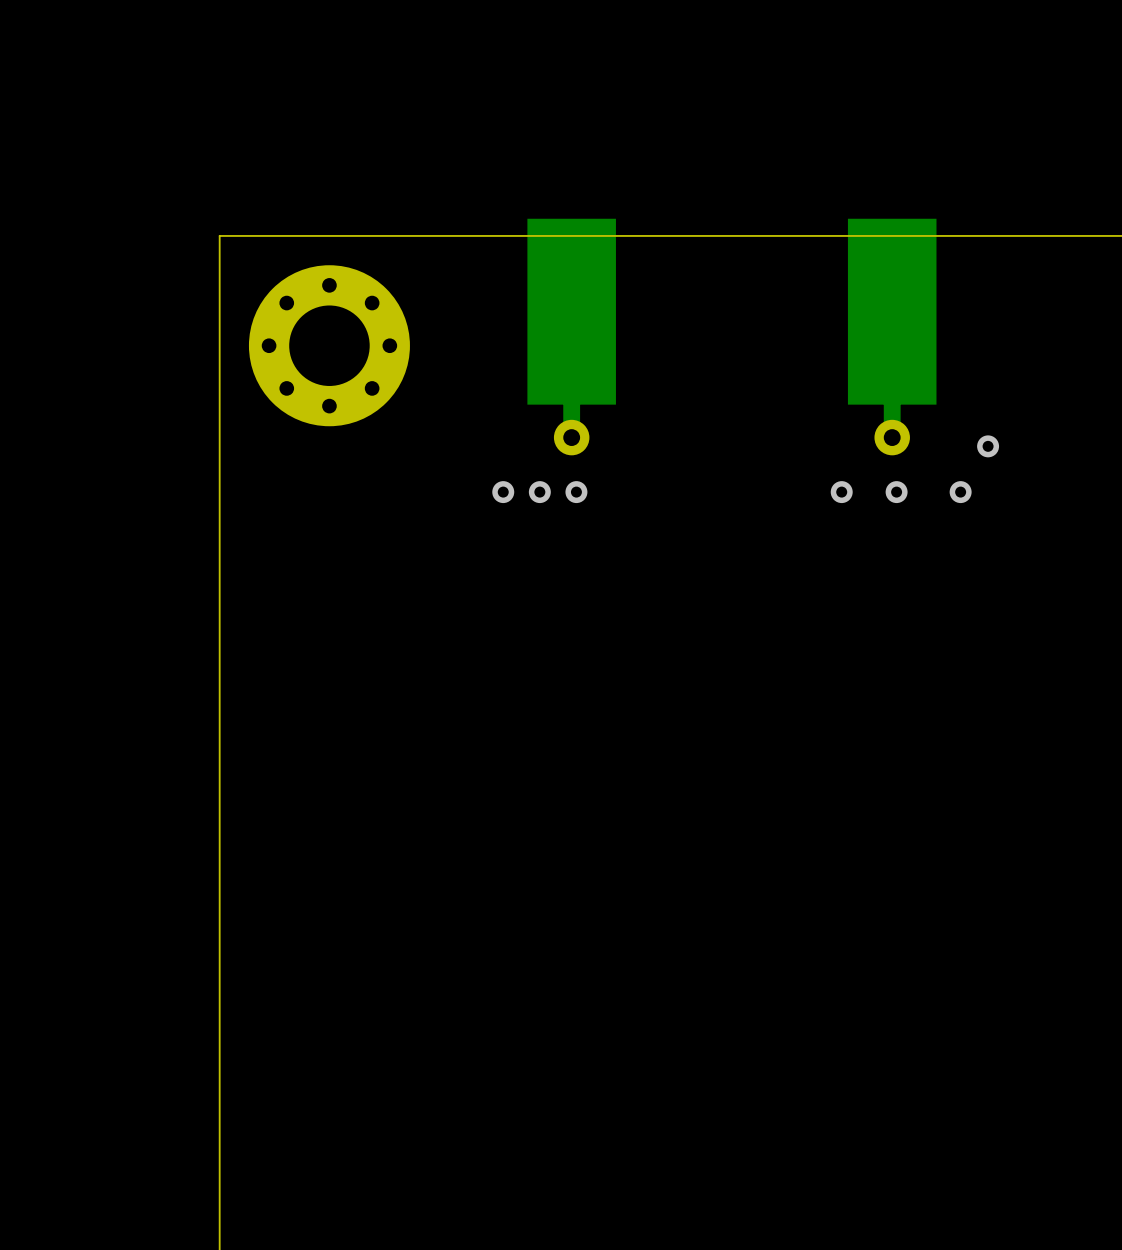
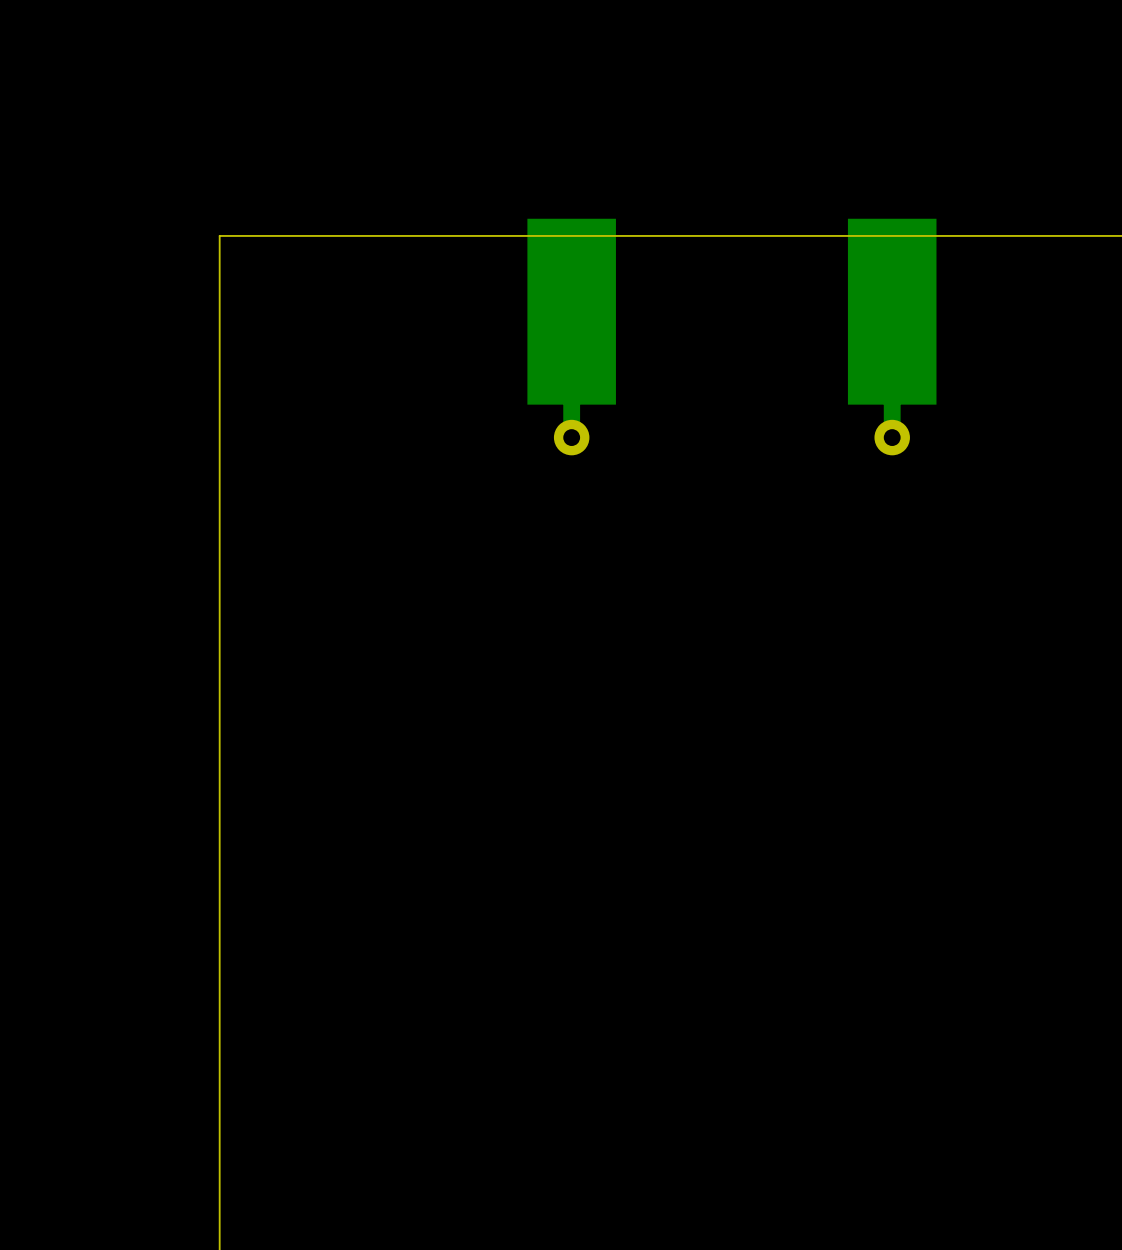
part: (329, 345) -> none
via: (988, 446) -> none
via: (503, 492) -> none
via: (539, 492) -> none
via: (576, 492) -> none
via: (841, 492) -> none
via: (896, 492) -> none
via: (960, 492) -> none

